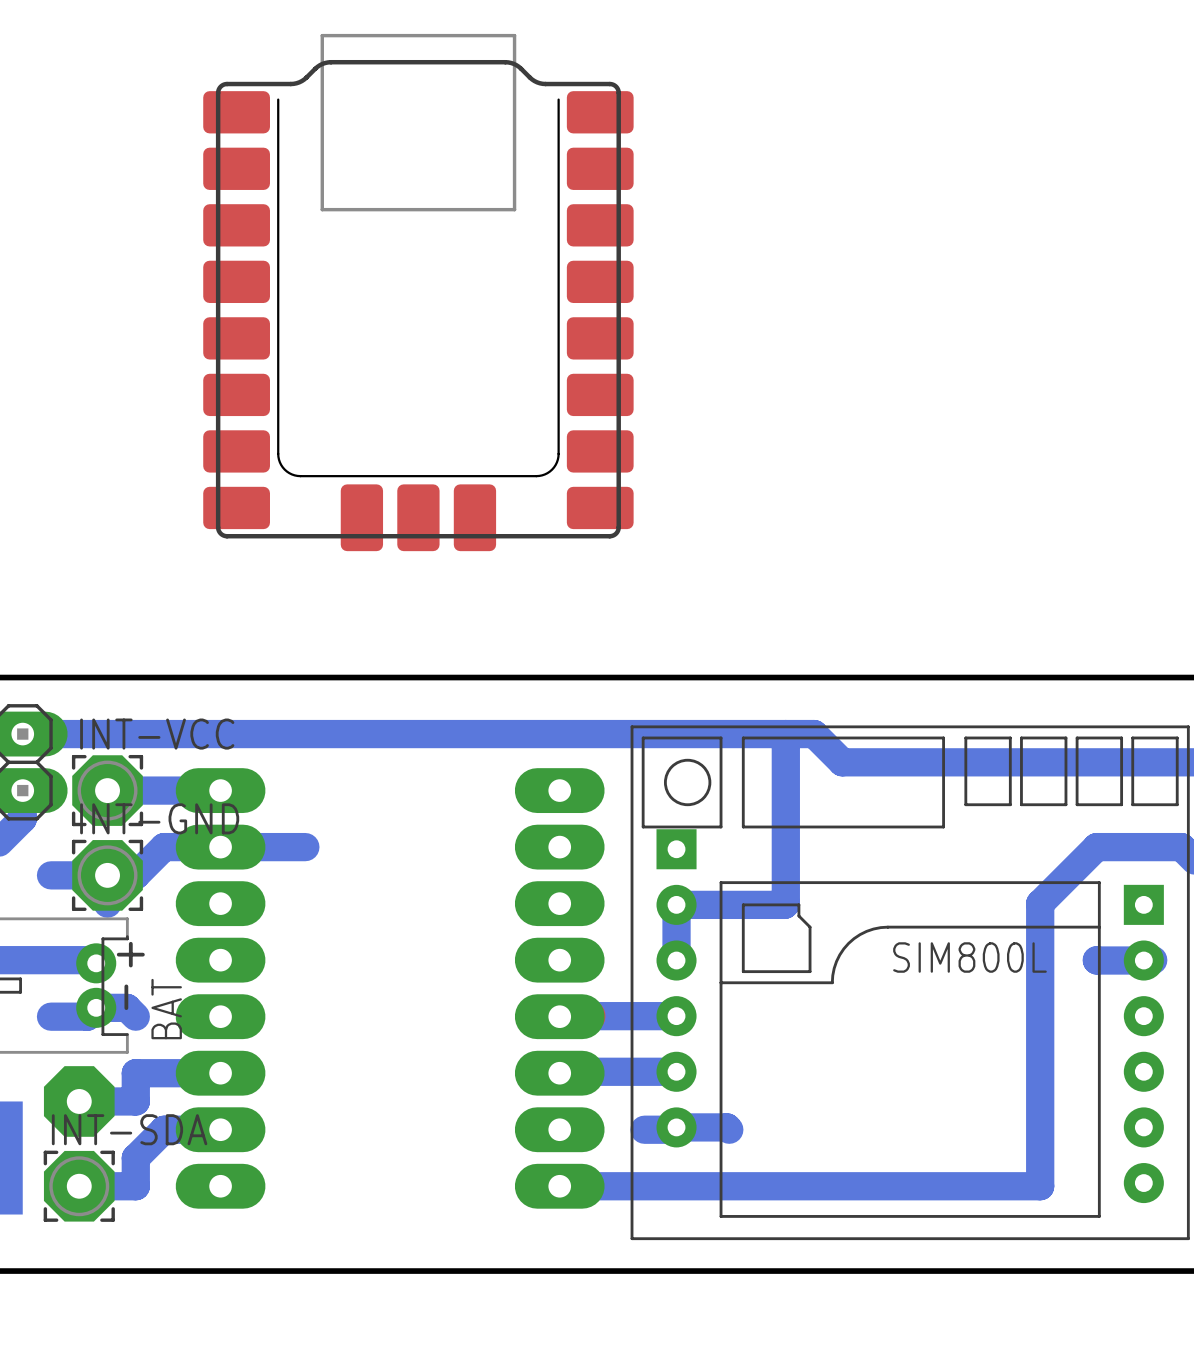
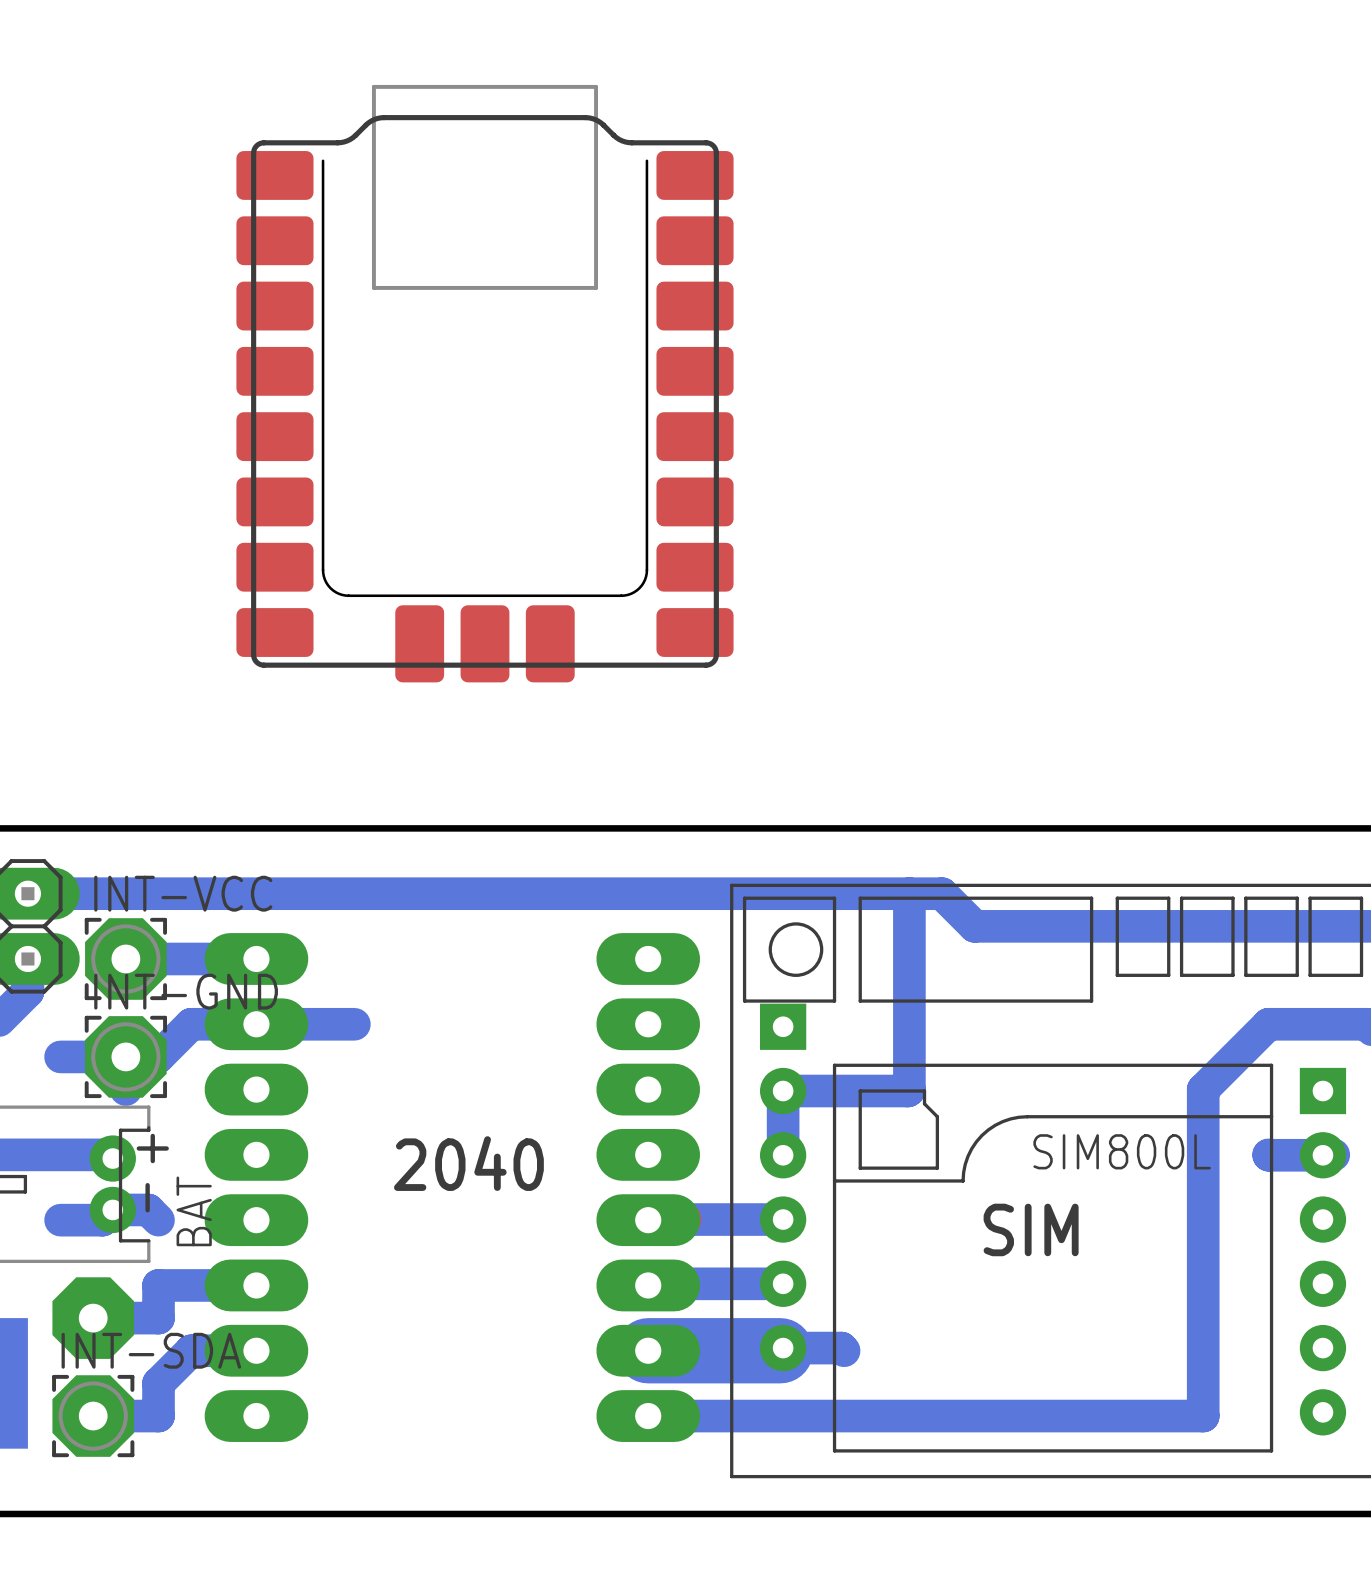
text: none -> 2040 (468, 1163)
text: none -> SIM (1031, 1229)
bottom track: none -> (648, 1350) (780, 1350)

